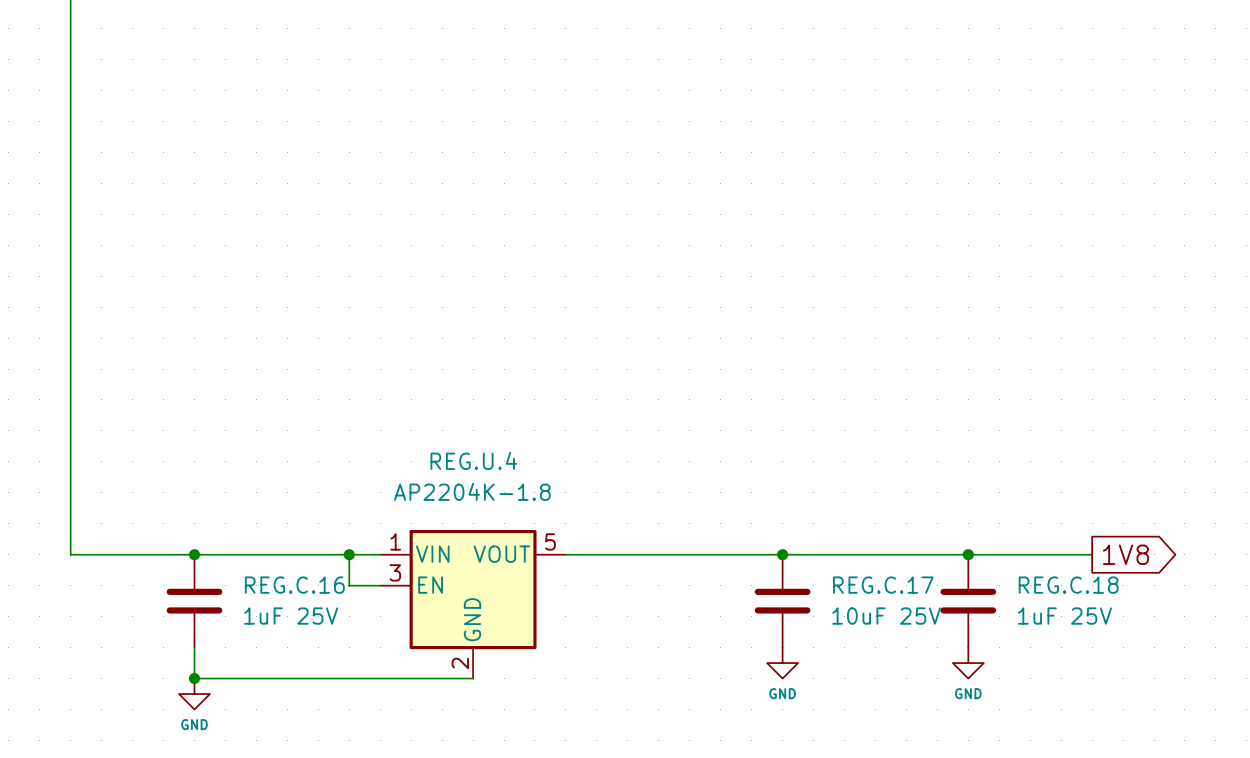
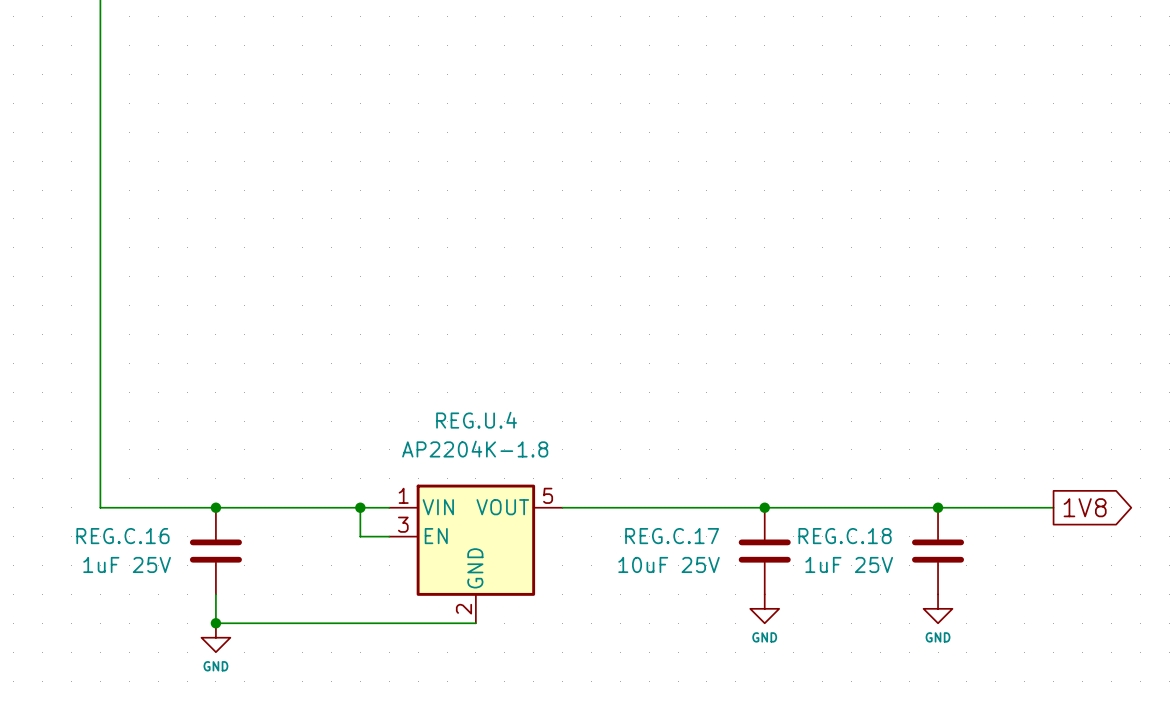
REG.C.16 name position: REG.C.16 (294, 585) -> REG.C.16 (122, 536)
REG.C.17 name position: REG.C.17 (883, 585) -> REG.C.17 (672, 536)
REG.C.18 name position: REG.C.18 (1068, 585) -> REG.C.18 (845, 536)
REG.C.16 value position: 1uF 25V (291, 616) -> 1uF 25V (127, 564)
REG.C.17 value position: 10uF 25V (886, 616) -> 10uF 25V (669, 564)
REG.C.18 value position: 1uF 25V (1064, 616) -> 1uF 25V (849, 564)

